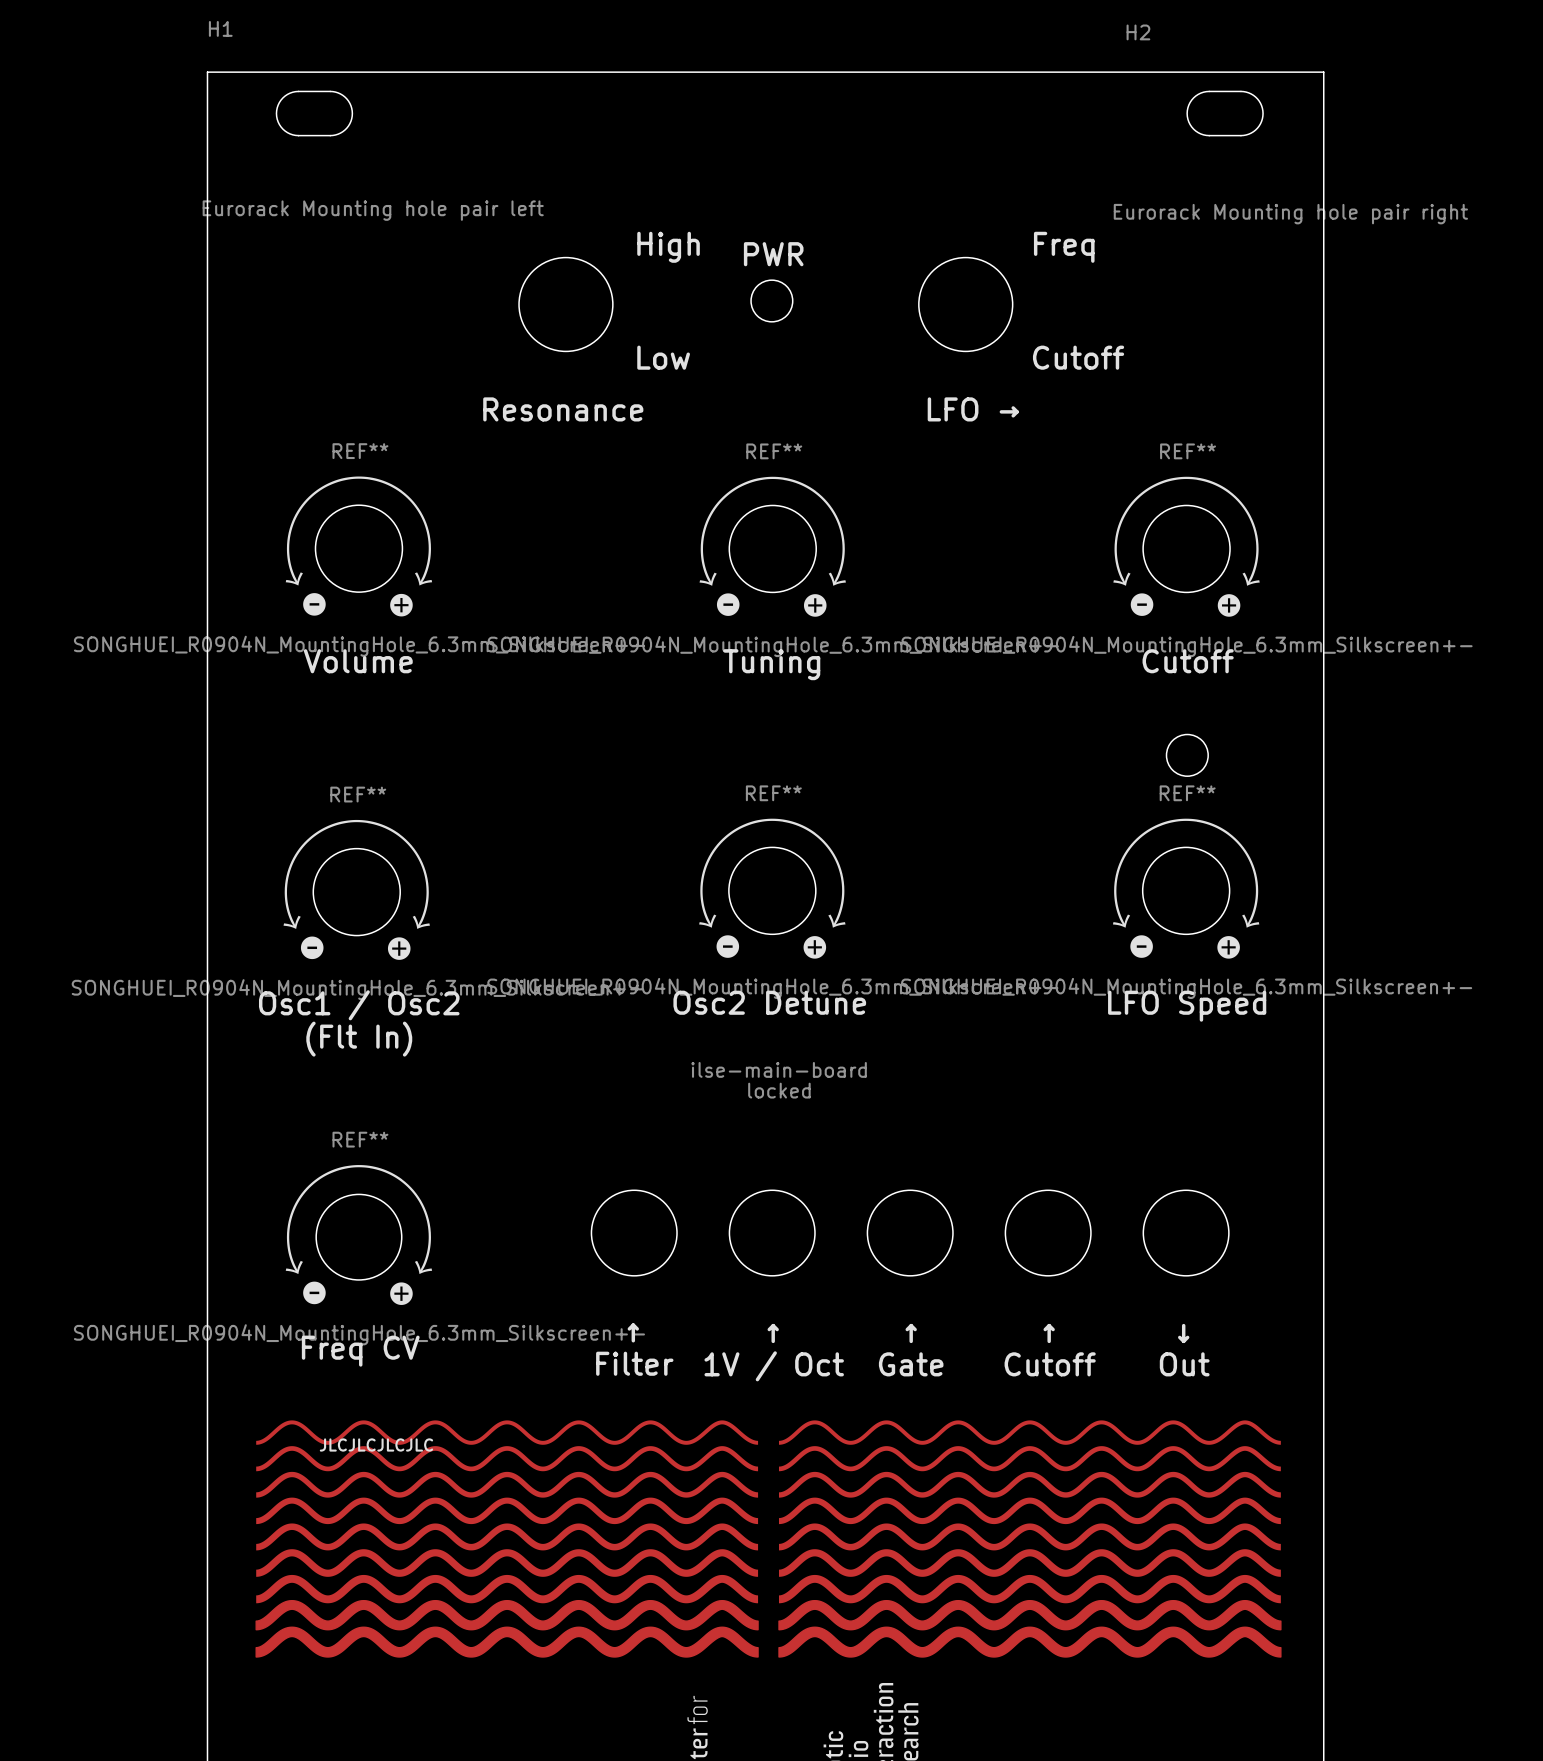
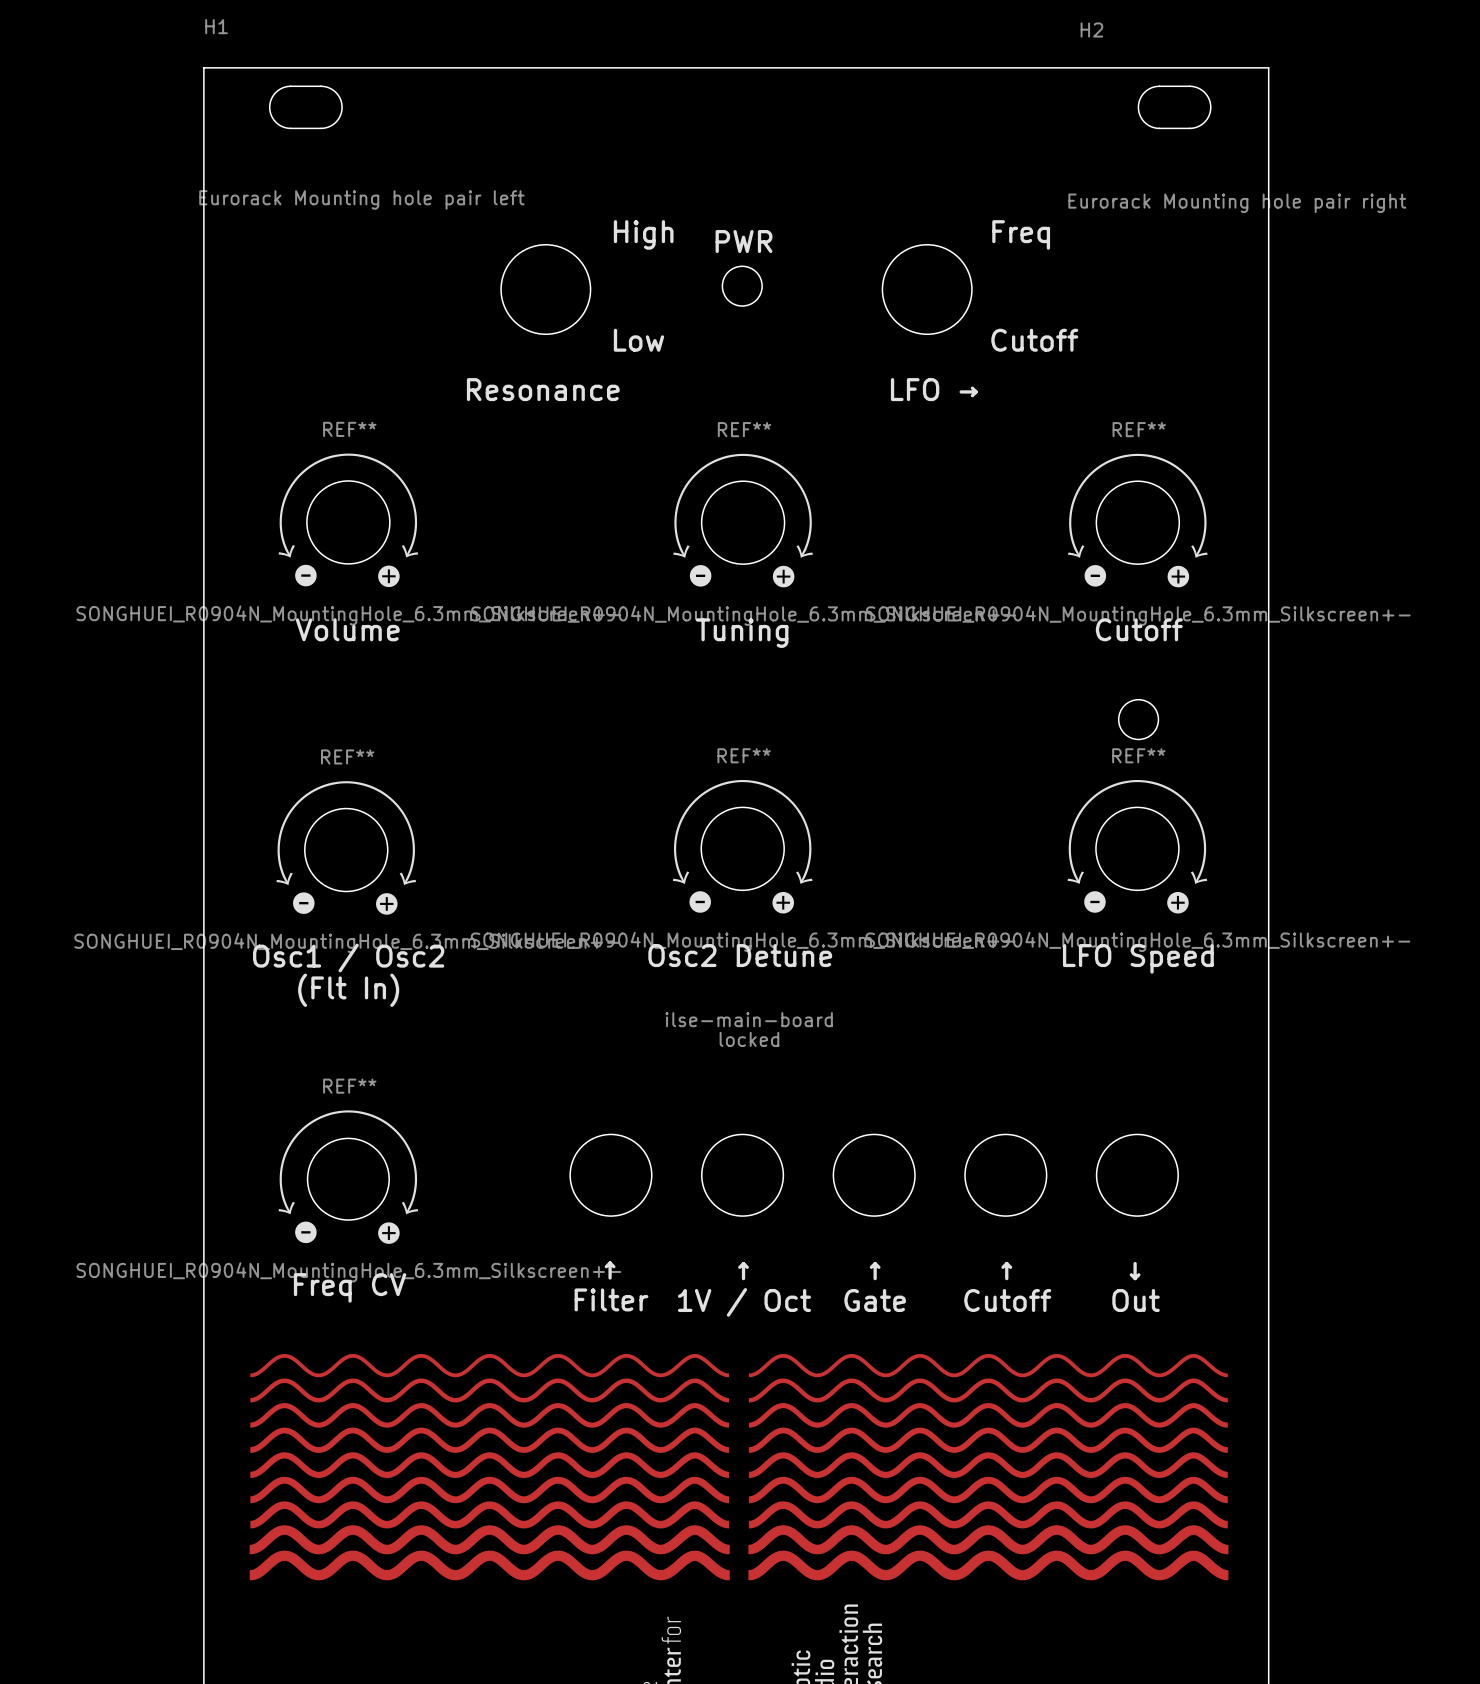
text: JLCJLCJLCJLC (376, 1444) -> none

